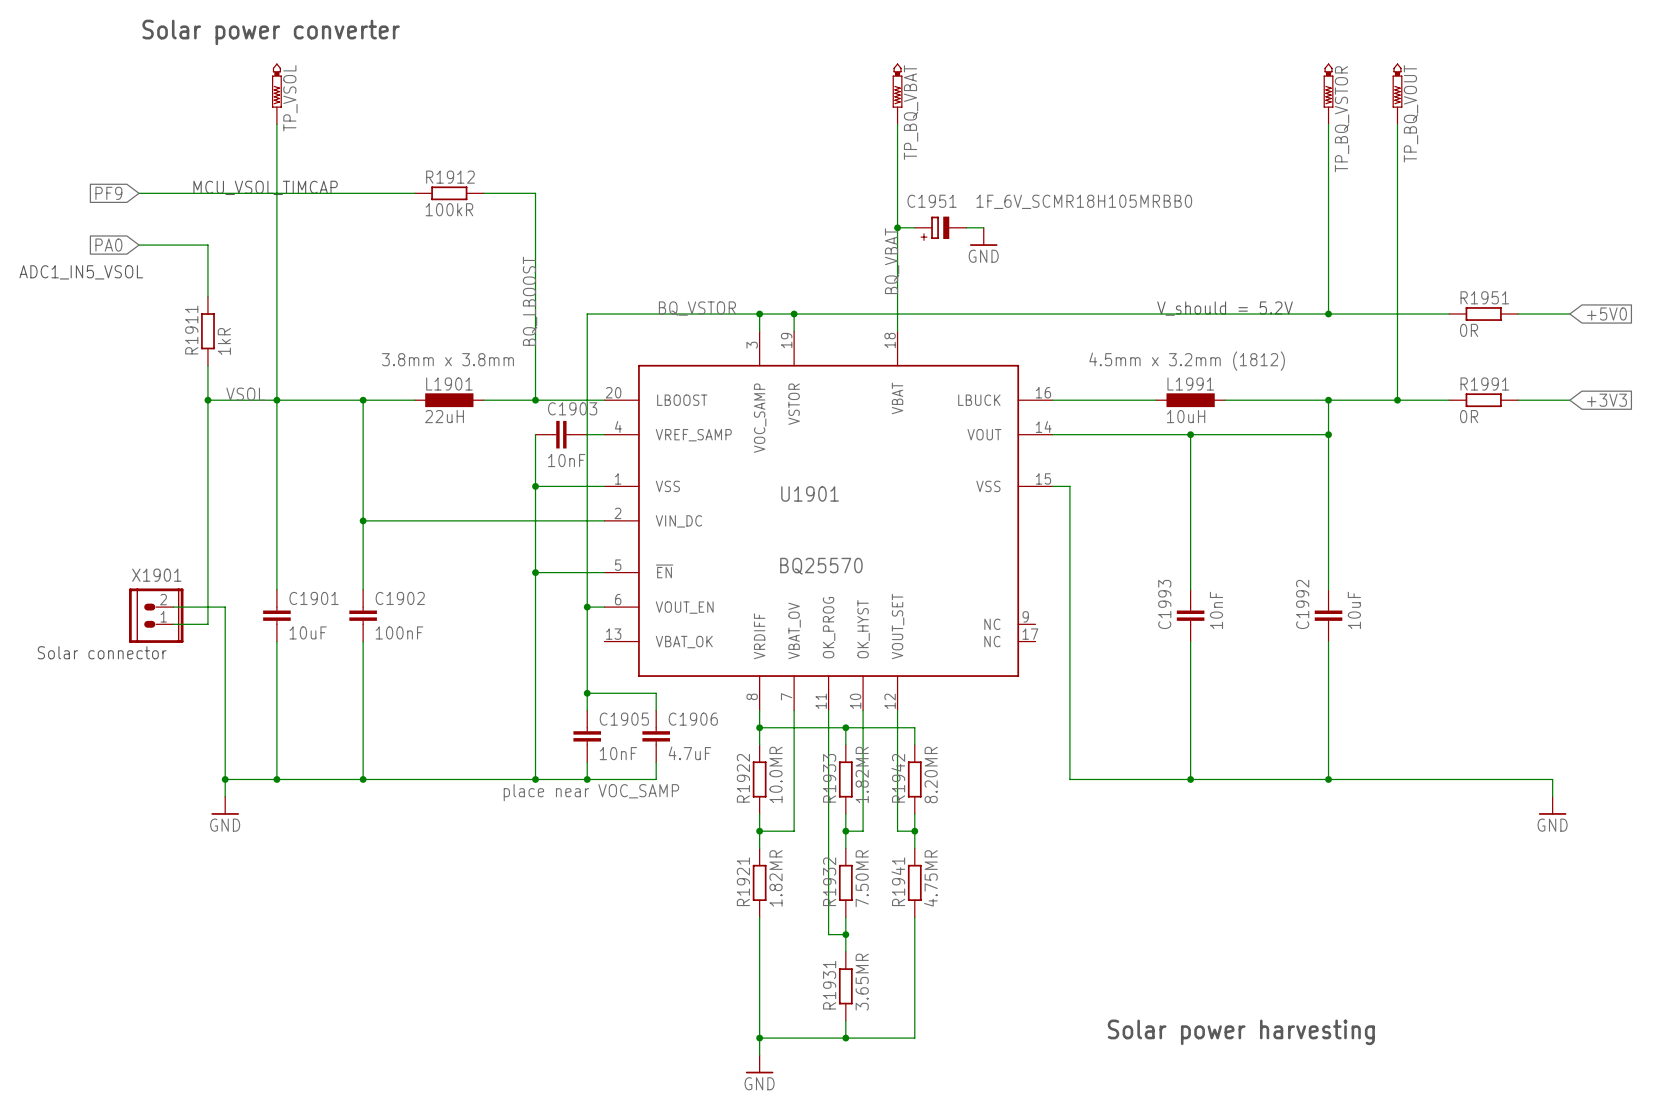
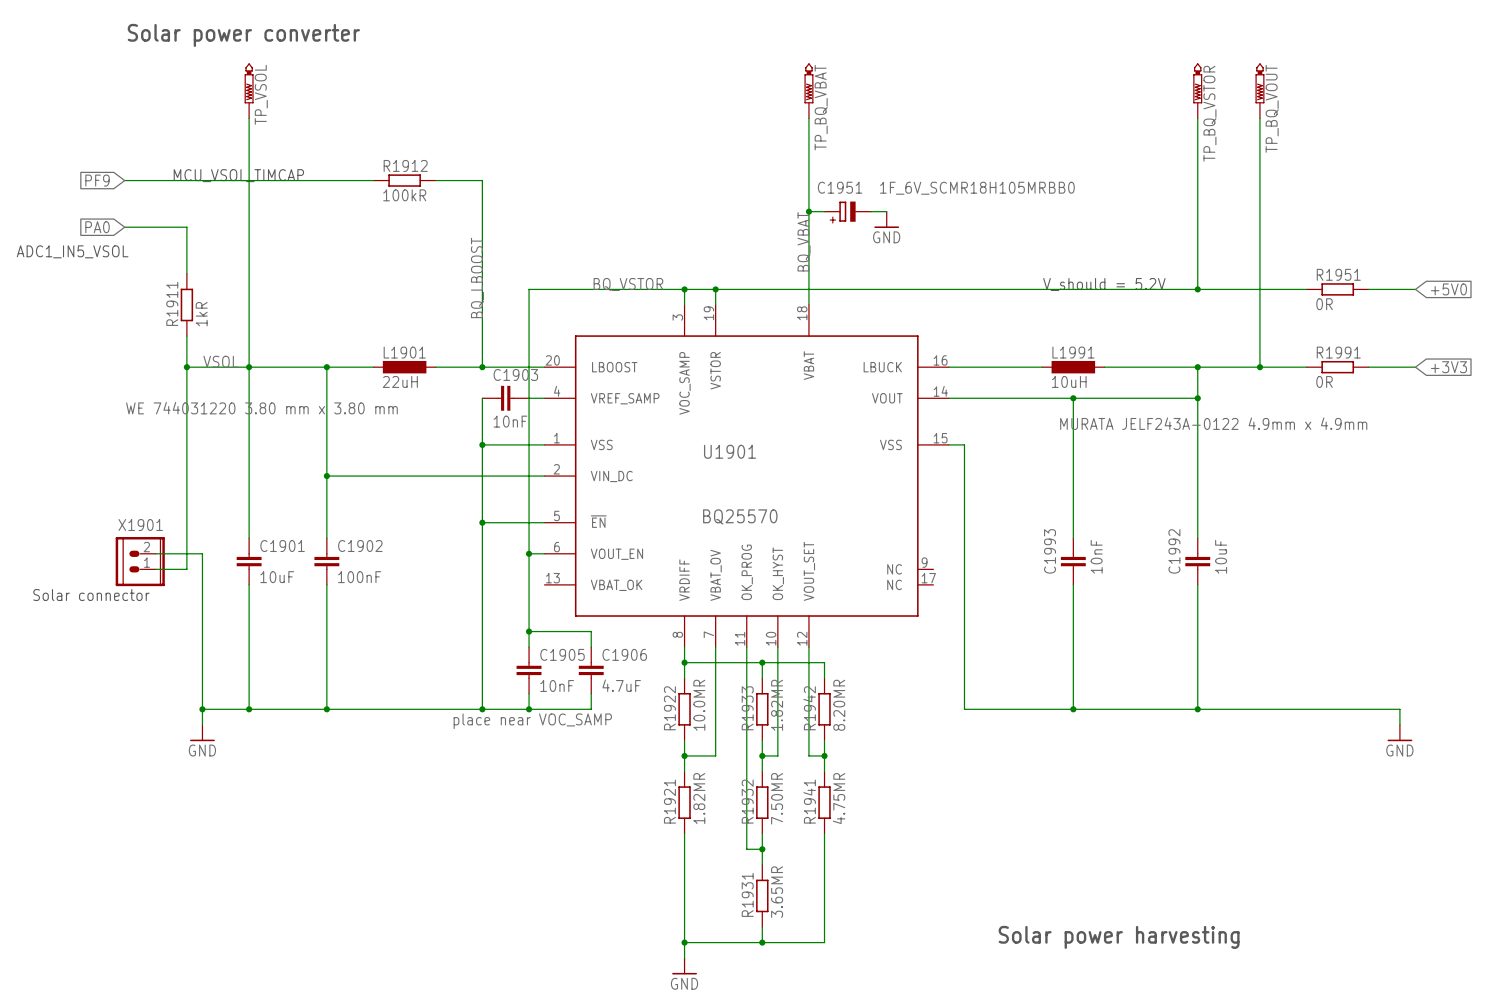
text: 3.8mm x 3.8mm (447, 359) -> none
text: 4.5mm x 3.2mm (1812) (1187, 361) -> none
text: none -> WE 744031220 3.80 mm x 3.80 mm (261, 408)
text: none -> MURATA JELF243A-0122 4.9mm x 4.9mm (1213, 423)

